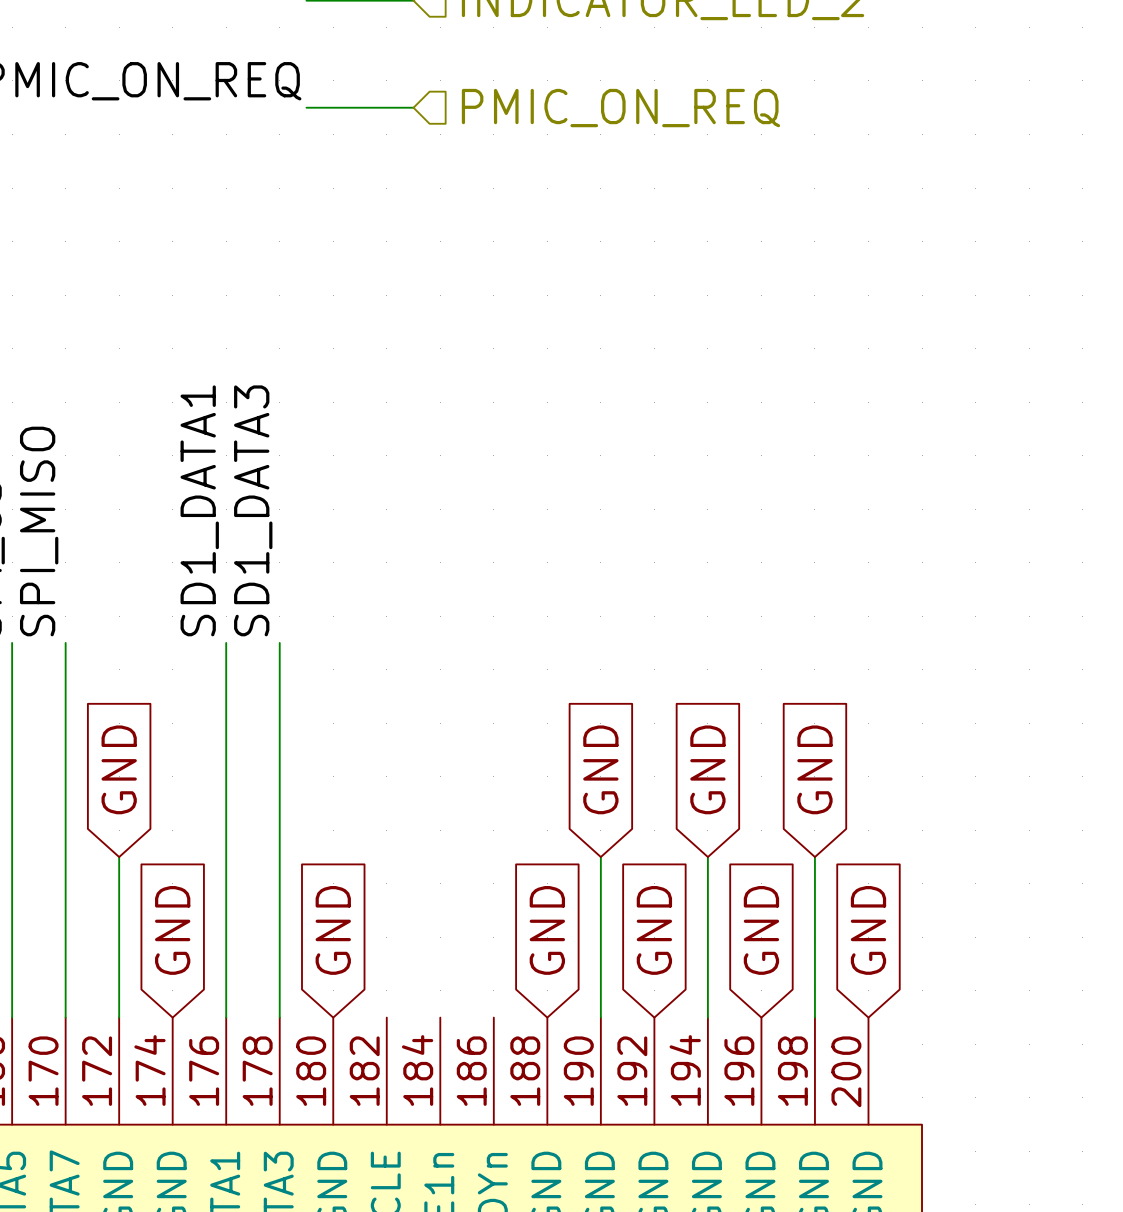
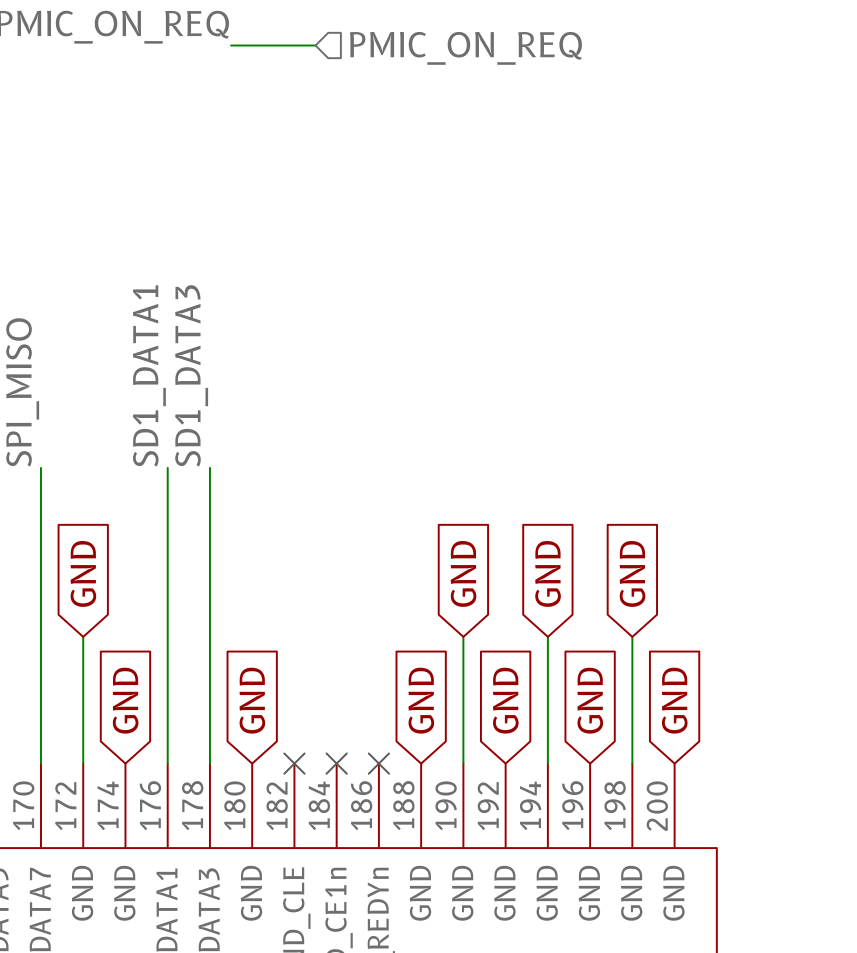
no-connect mark: none -> (294, 763)
no-connect mark: none -> (336, 763)
no-connect mark: none -> (378, 763)

